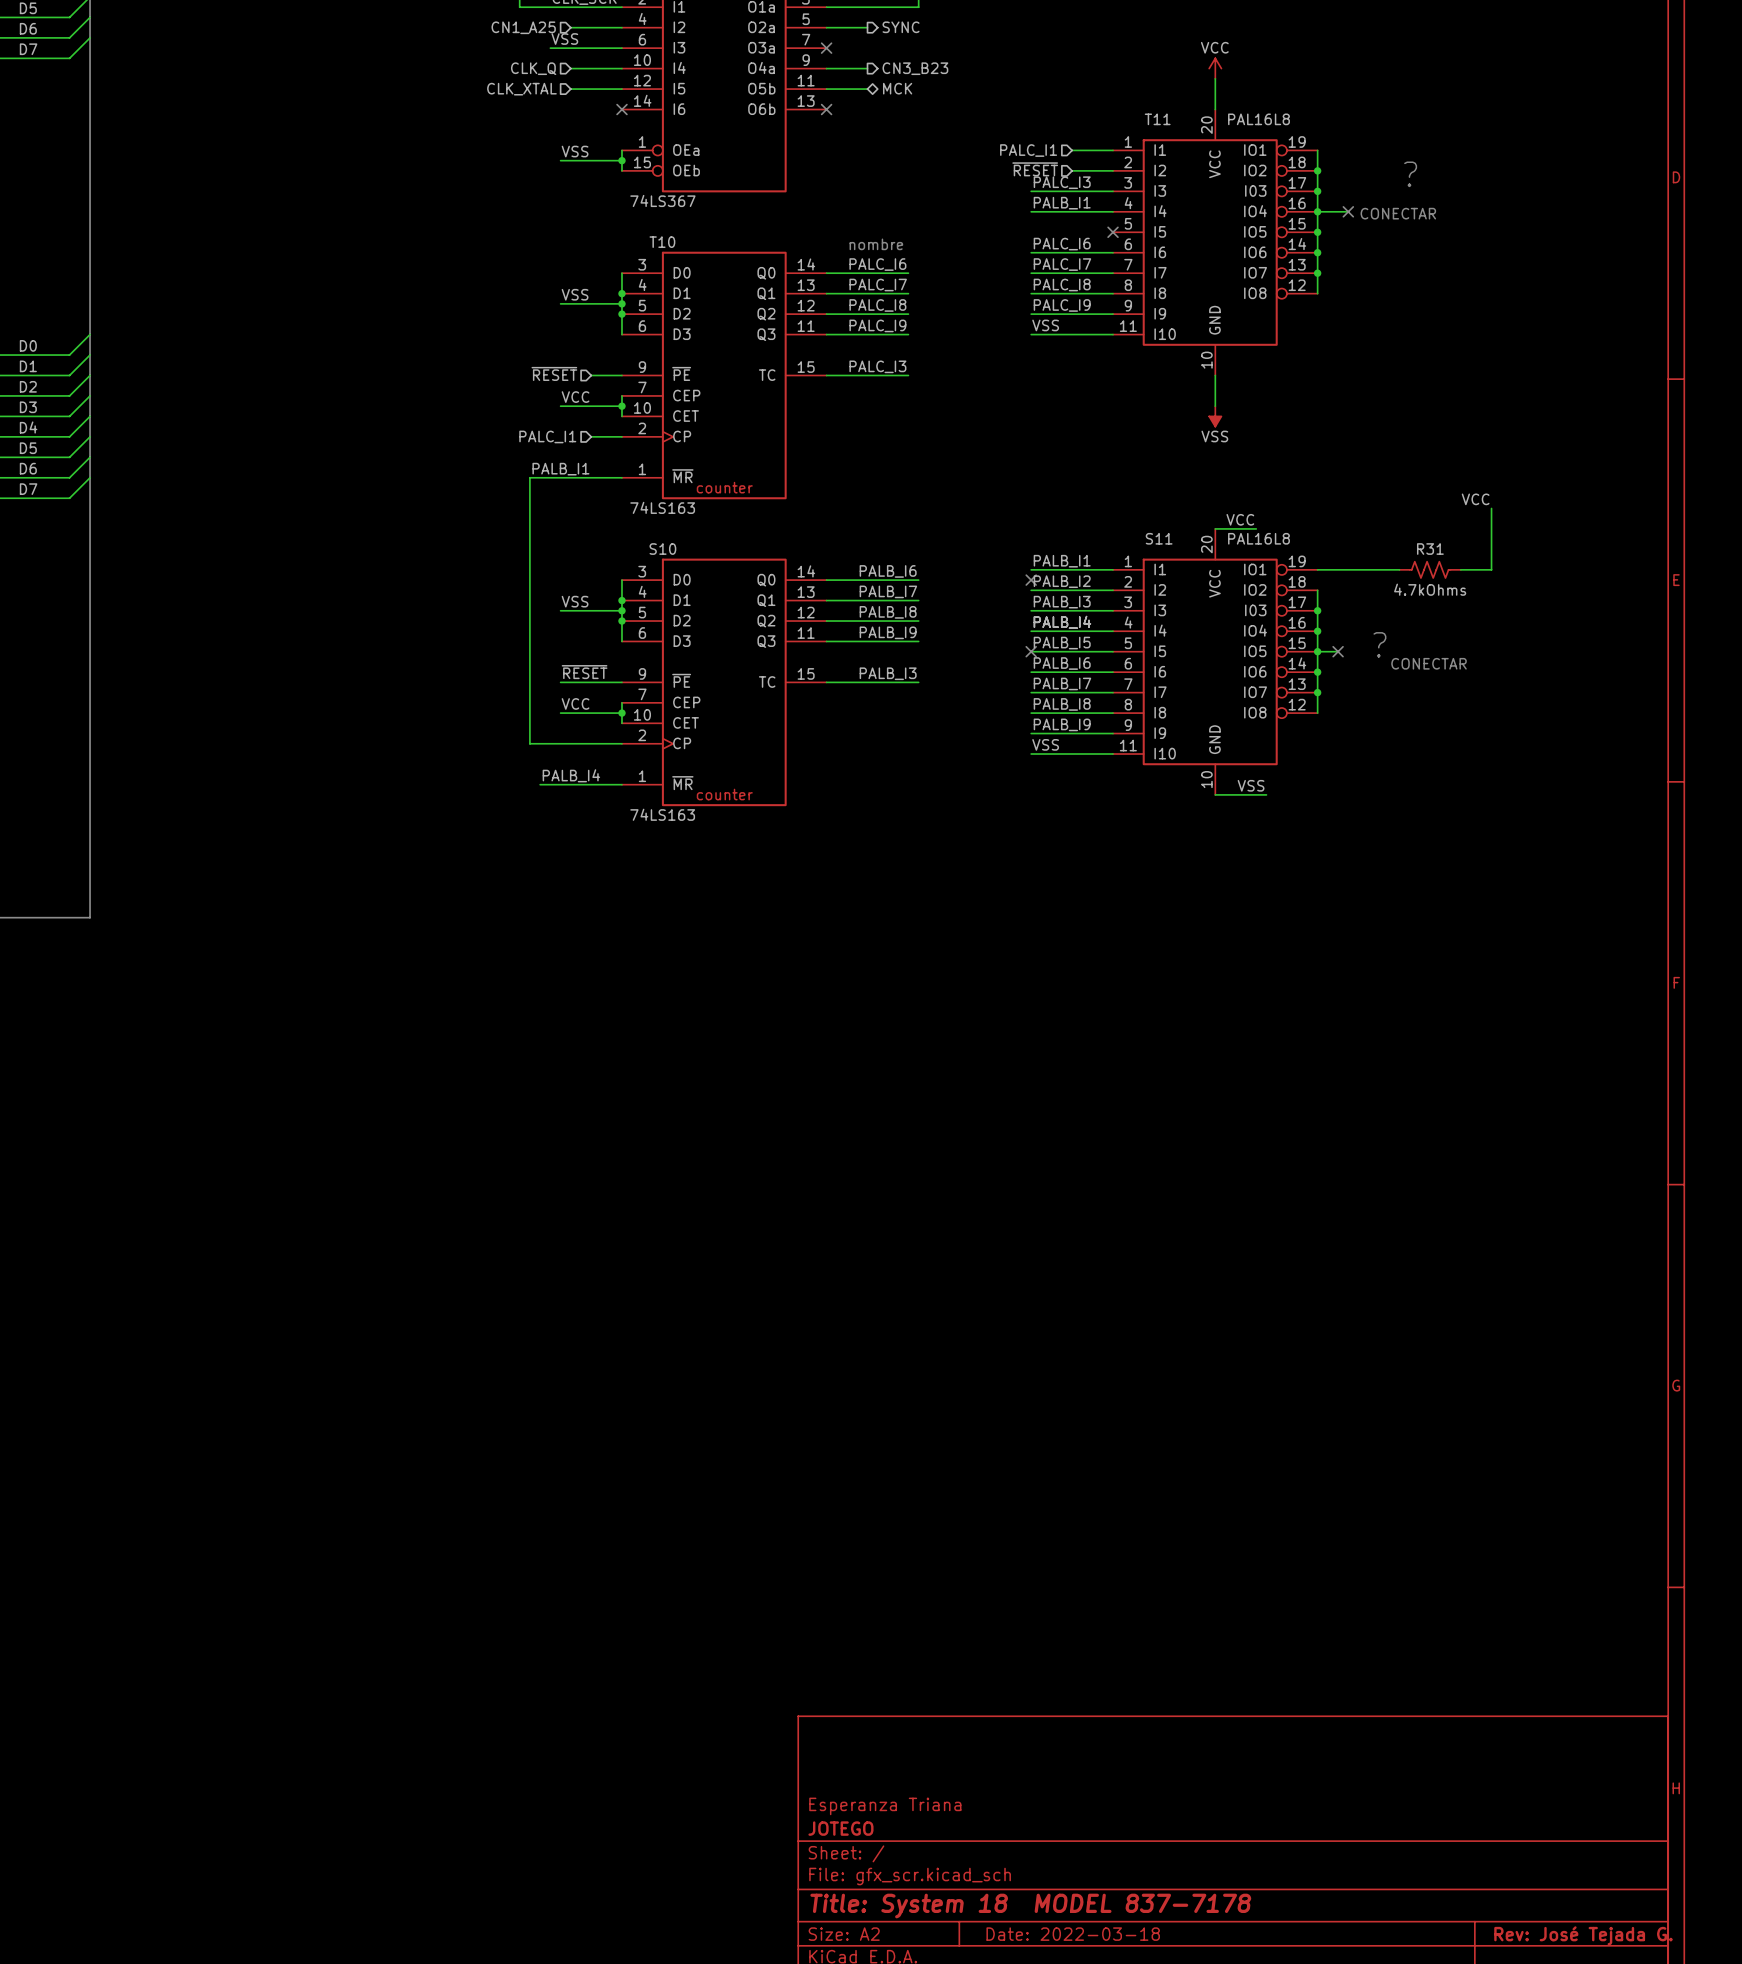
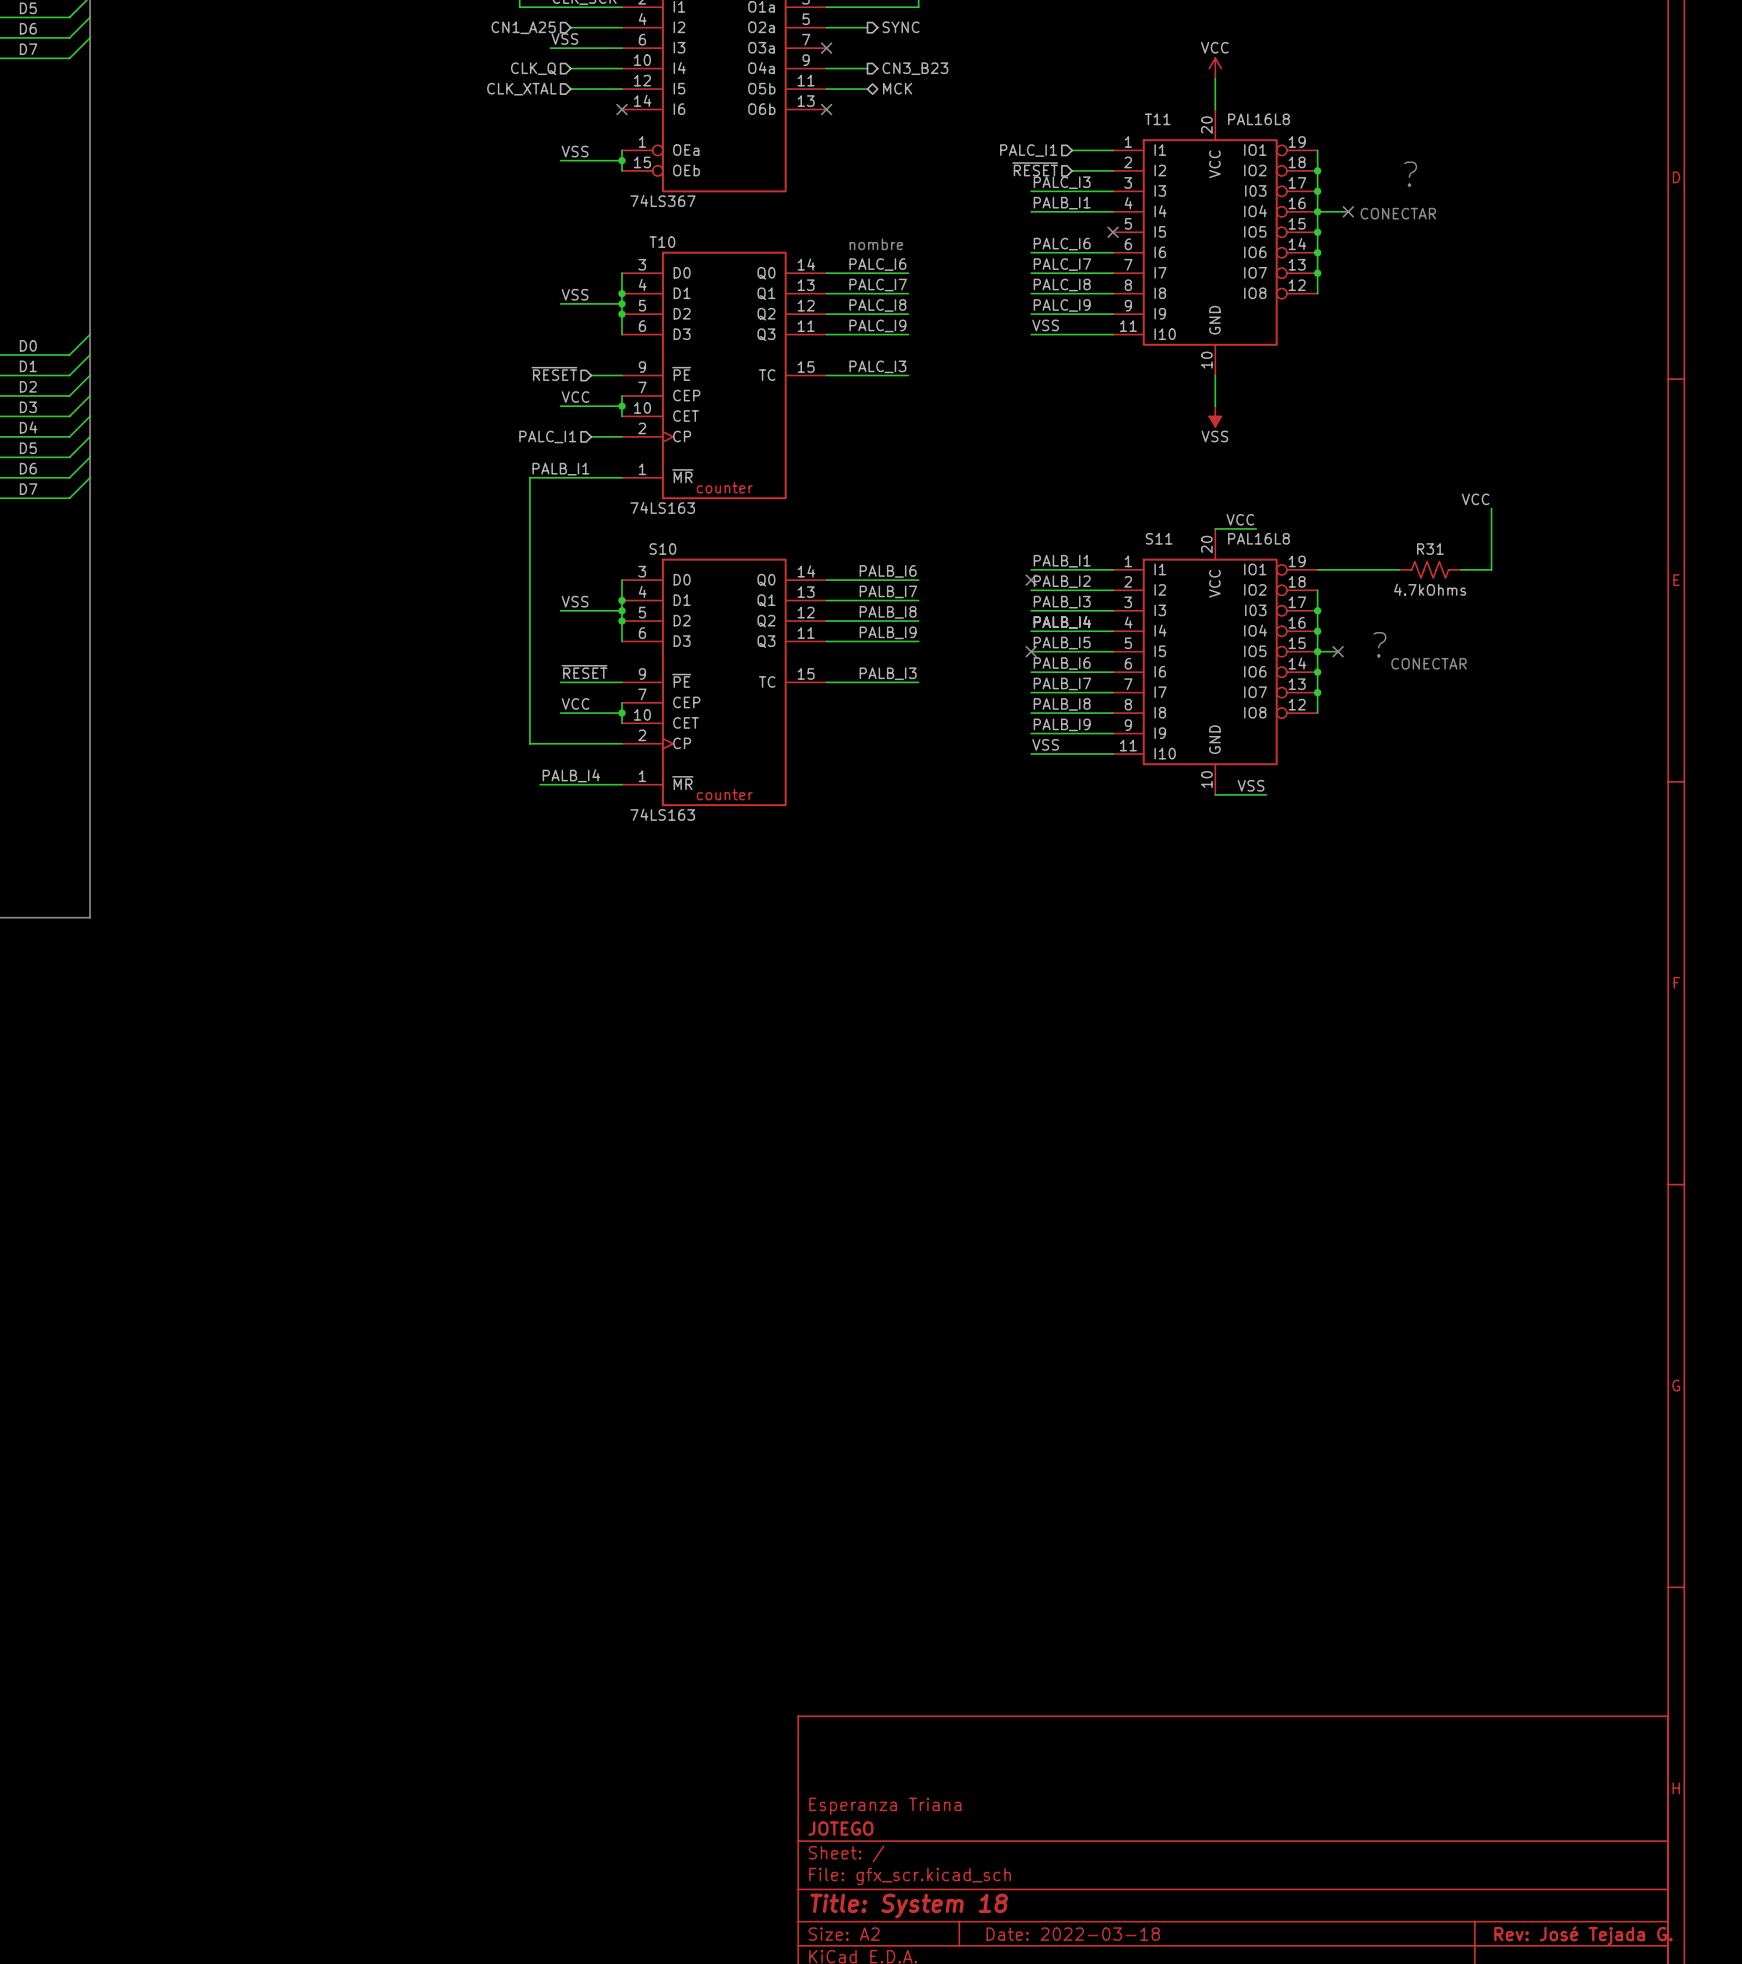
title block: Title: System 18 MODEL 837-7178 (1030, 1906) -> Title: System 18 (909, 1906)

